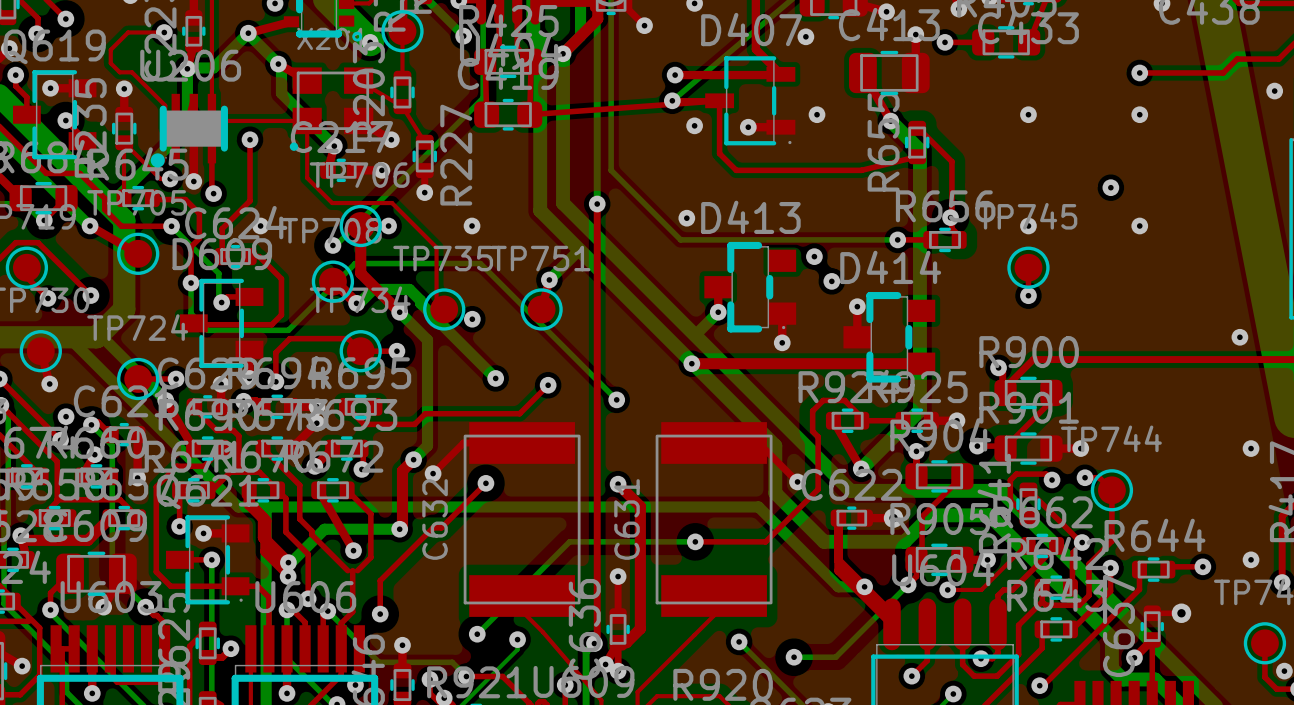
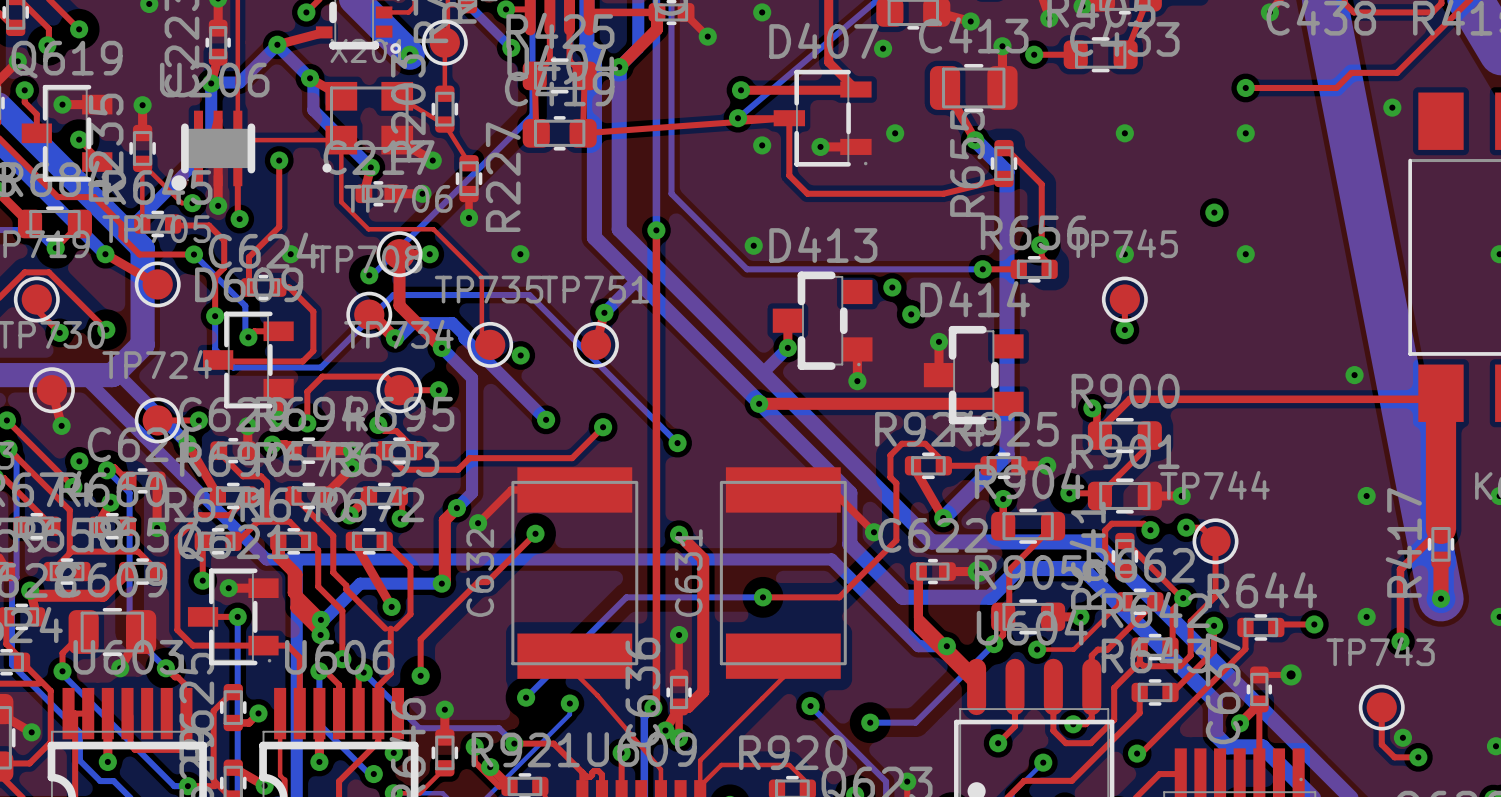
top track: (164, 32) (128, 32) (110, 49) (110, 63) (119, 72) (132, 72) (165, 105) (165, 128) (175, 138) (175, 154) -> none
via: (164, 32) -> none
top track: none -> (378, 424) (384, 431) (396, 431) (414, 449)
via: none -> (378, 424)

